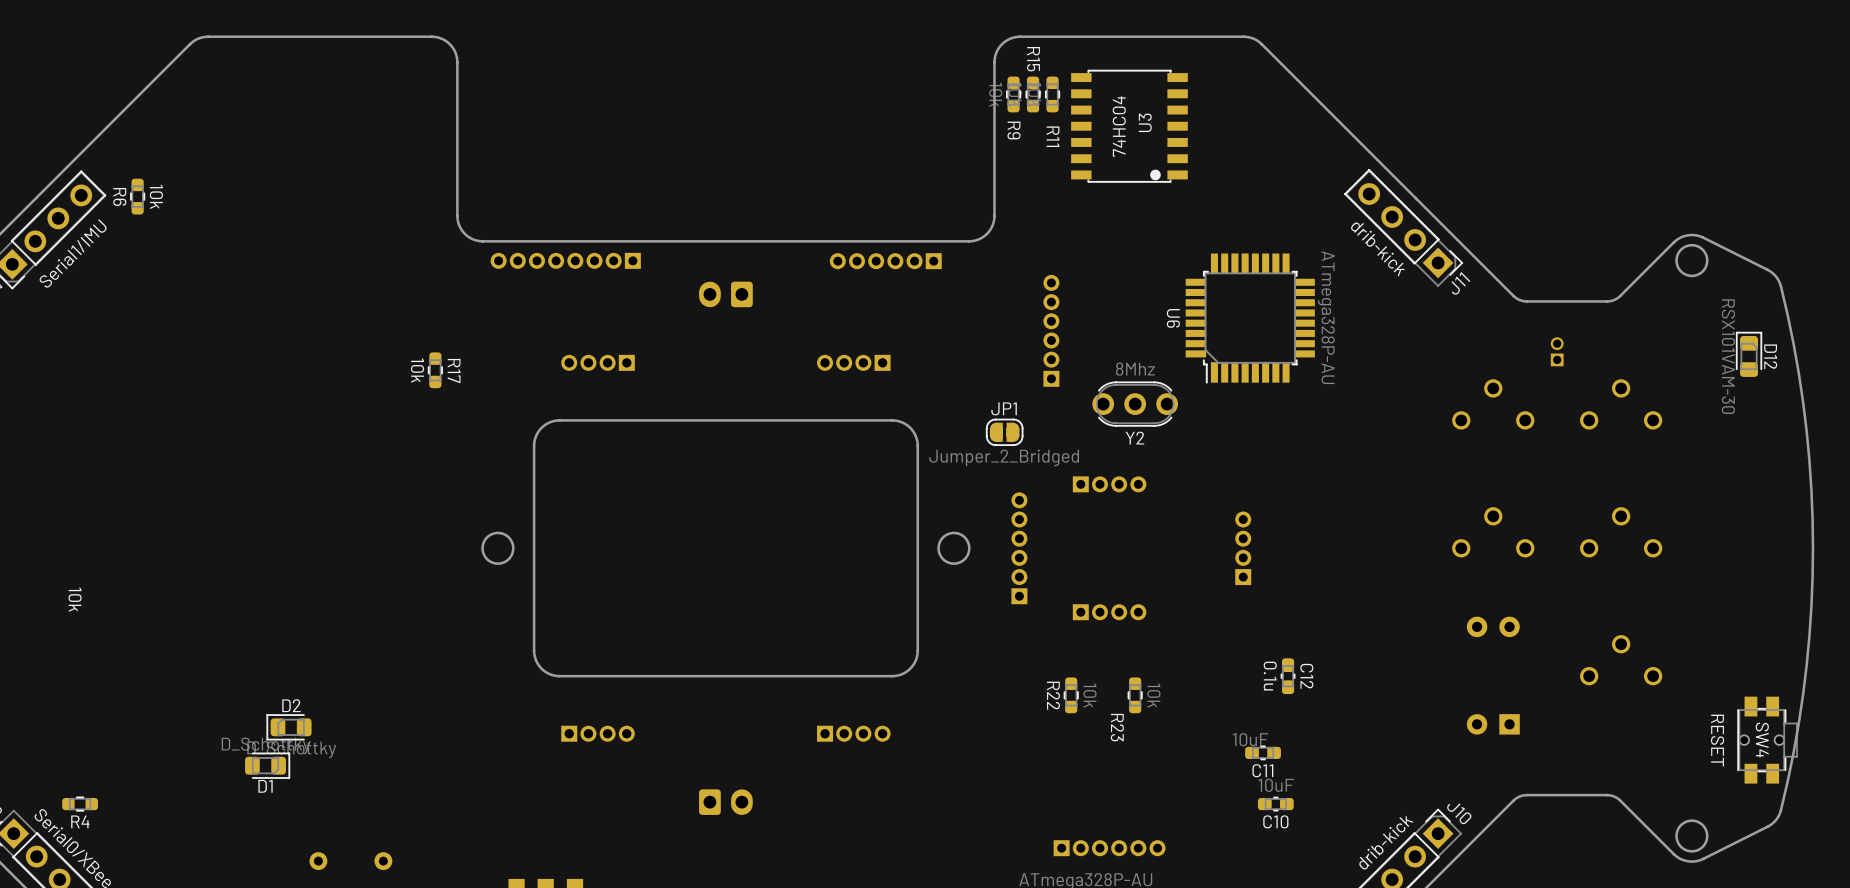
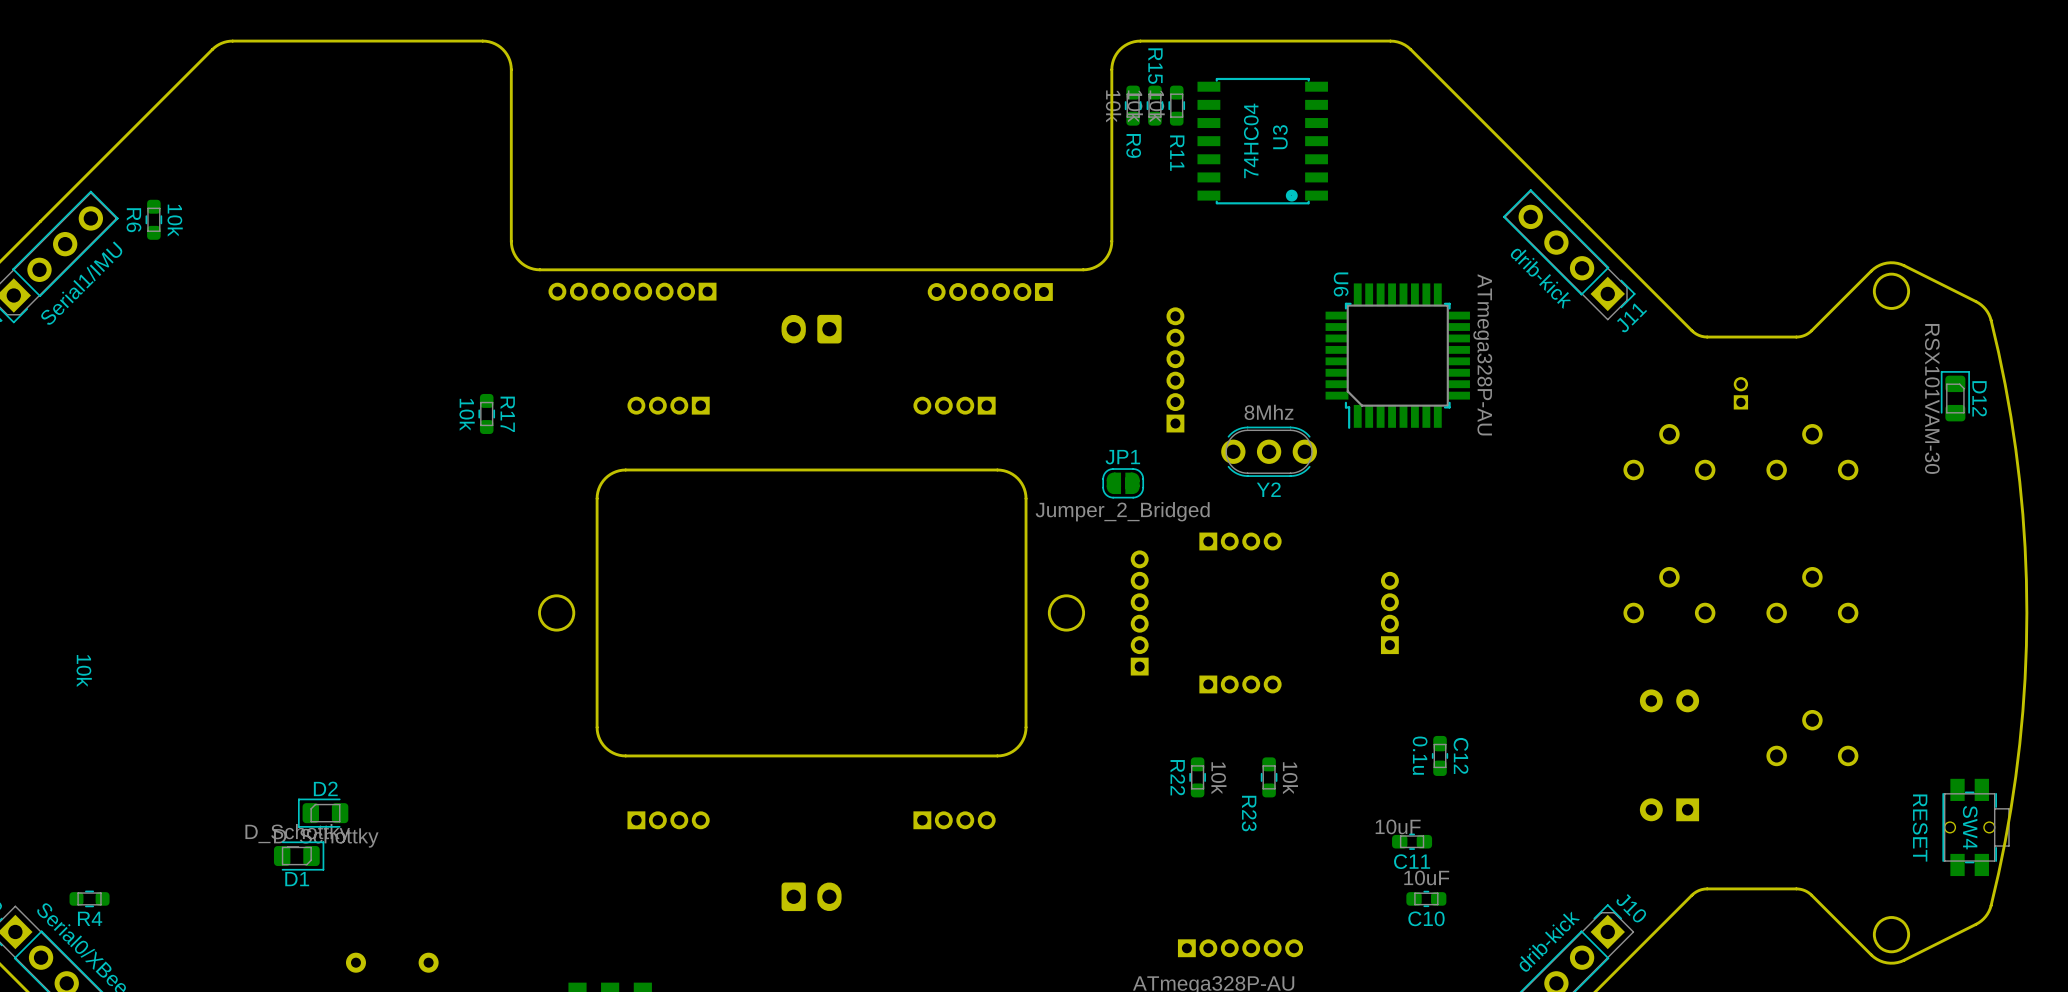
U6 name position: U6 (1173, 318) -> U6 (1341, 284)

